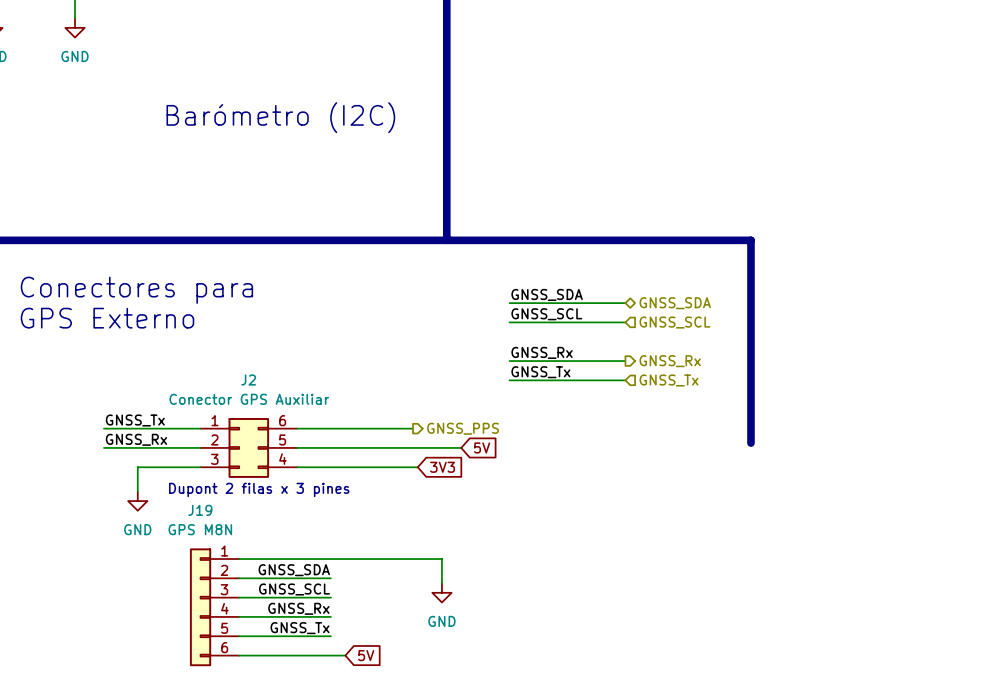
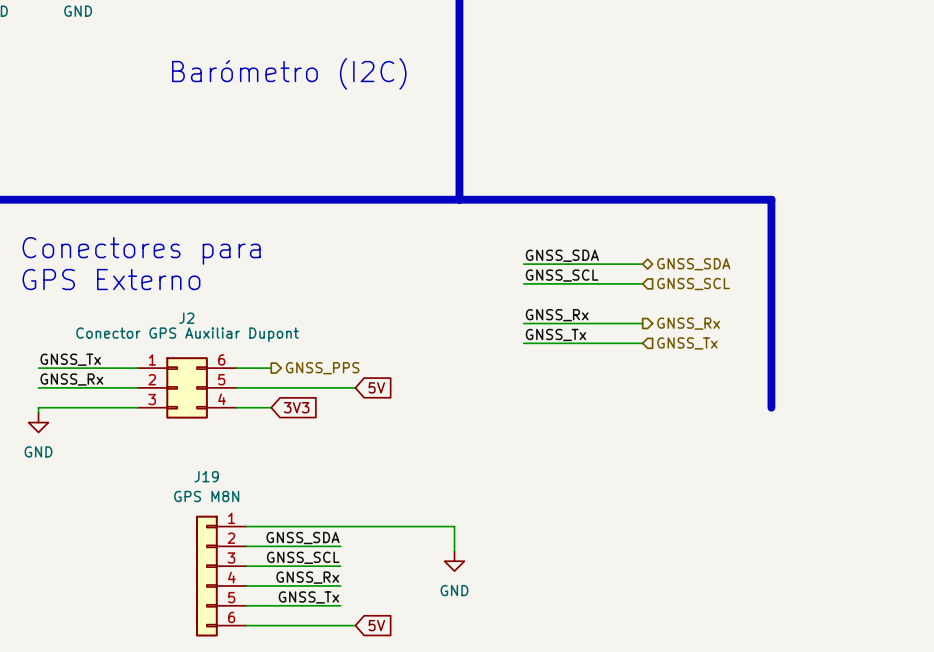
J2 value: Conector GPS Auxiliar (249, 399) -> Conector GPS Auxiliar Dupont (187, 334)
wire: none -> (236, 368) (271, 368)
label position: GNSS_Tx (135, 420) -> GNSS_Tx (70, 359)
wire: (103, 428) (200, 428) -> (38, 387) (137, 387)
wire: (297, 428) (412, 428) -> (236, 387) (355, 387)
hierarchical label position: GNSS_PPS (463, 428) -> GNSS_PPS (322, 368)
label position: GNSS_Rx (136, 439) -> GNSS_Rx (71, 379)
wire: none -> (137, 407) (38, 407) (38, 412)
wire: (103, 447) (200, 447) -> (38, 368) (137, 368)
J2 position: (248, 447) -> (187, 387)
wire: (297, 447) (461, 447) -> none
global label position: 5V (482, 447) -> 5V (376, 387)
wire: (200, 467) (137, 467) (137, 491) -> none
wire: (297, 467) (417, 467) -> none
global label position: 3V3 (442, 467) -> 3V3 (296, 407)
text: Dupont 2 filas x 3 pines (259, 489) -> none
power symbol position: GND (137, 501) -> GND (38, 422)

